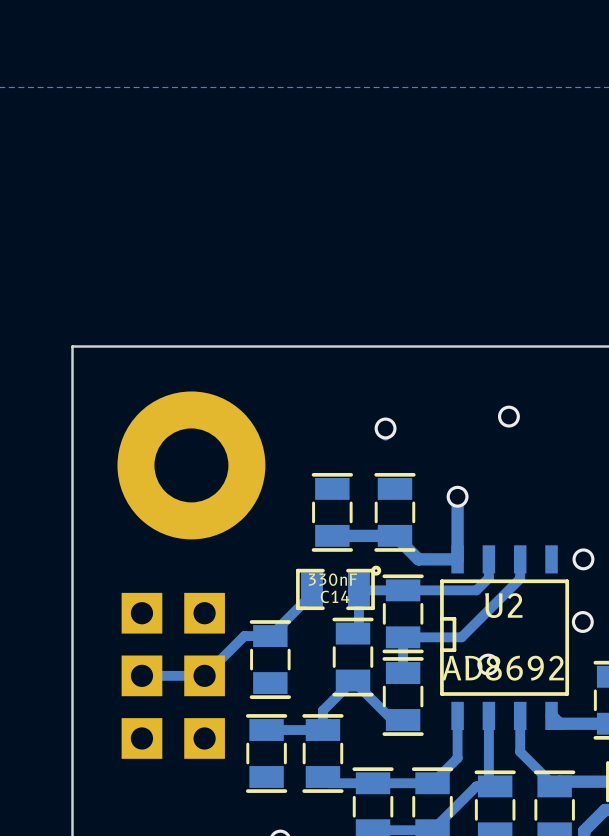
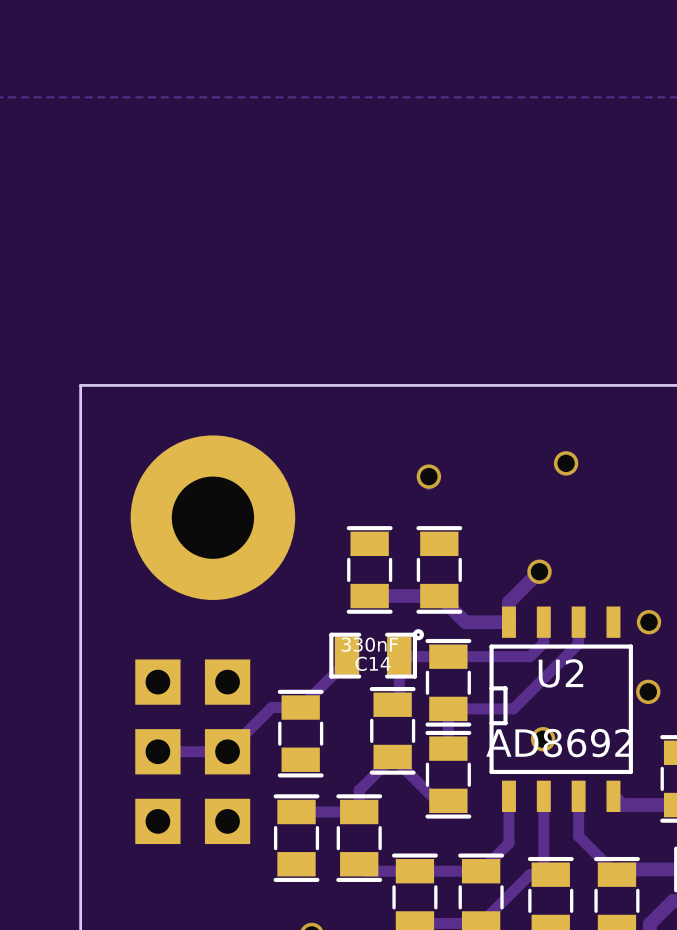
track: (457, 496) (457, 541) -> (539, 571) (508, 602)
via position: (457, 496) -> (539, 571)

